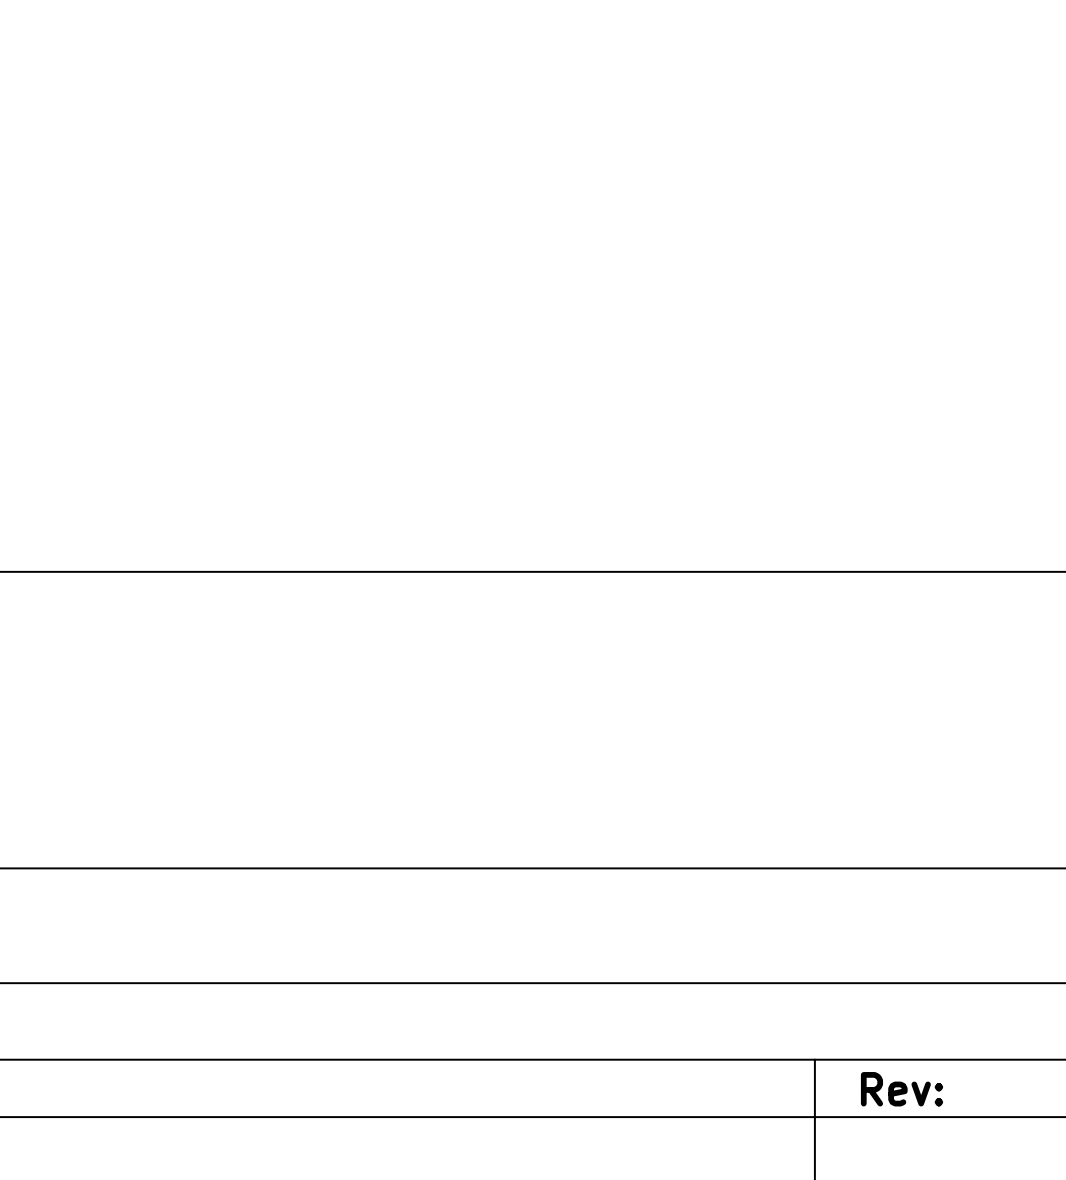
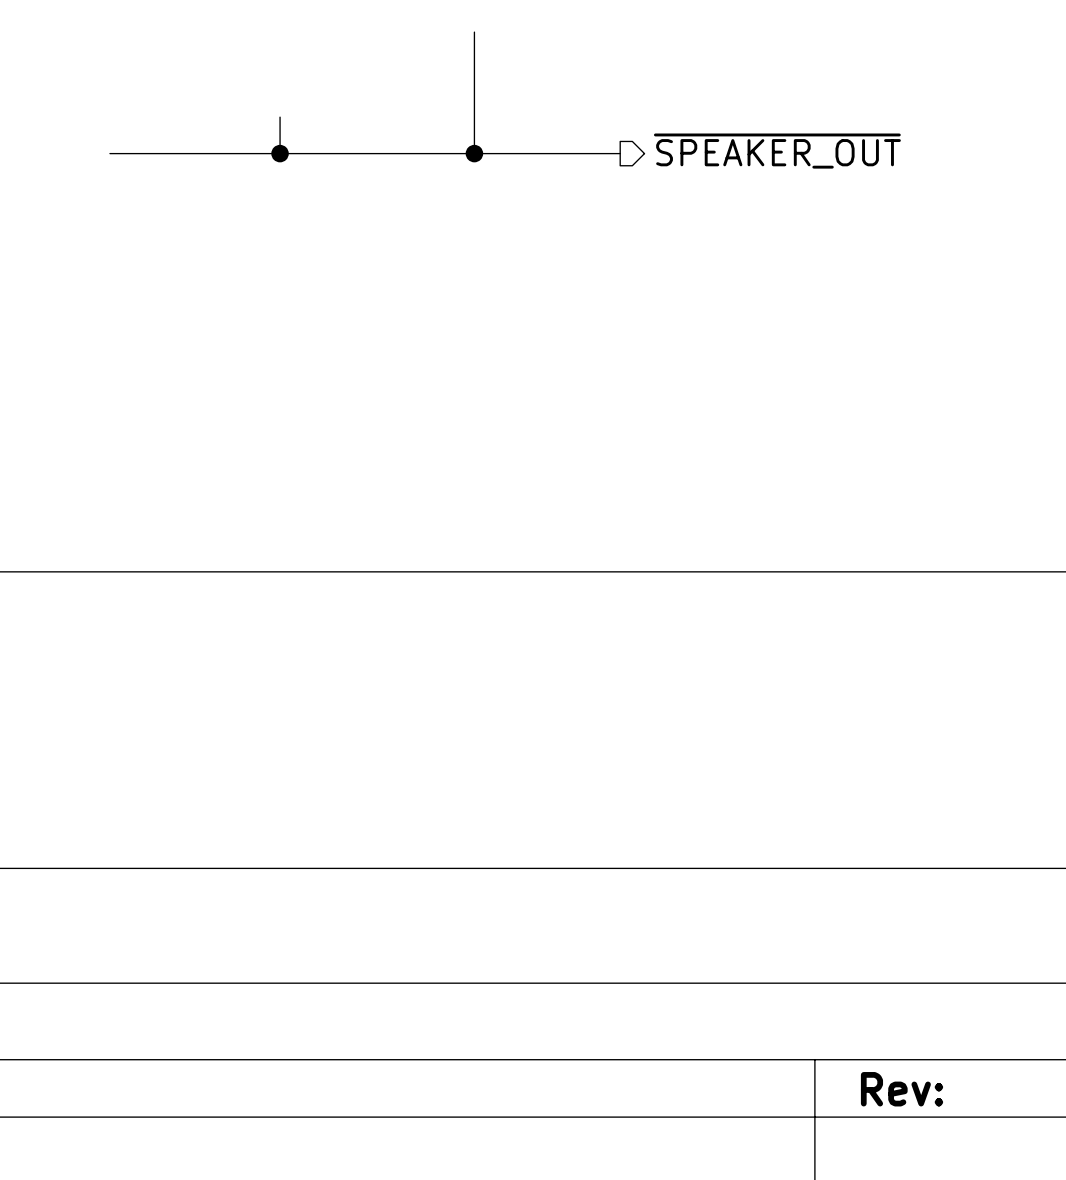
wire: none -> (474, 32) (474, 153)
wire: none -> (280, 117) (280, 153)
hierarchical label: none -> ~{SPEAKER_OUT} (777, 151)
wire: none -> (109, 153) (620, 153)
junction: none -> (280, 153)
junction: none -> (474, 153)

